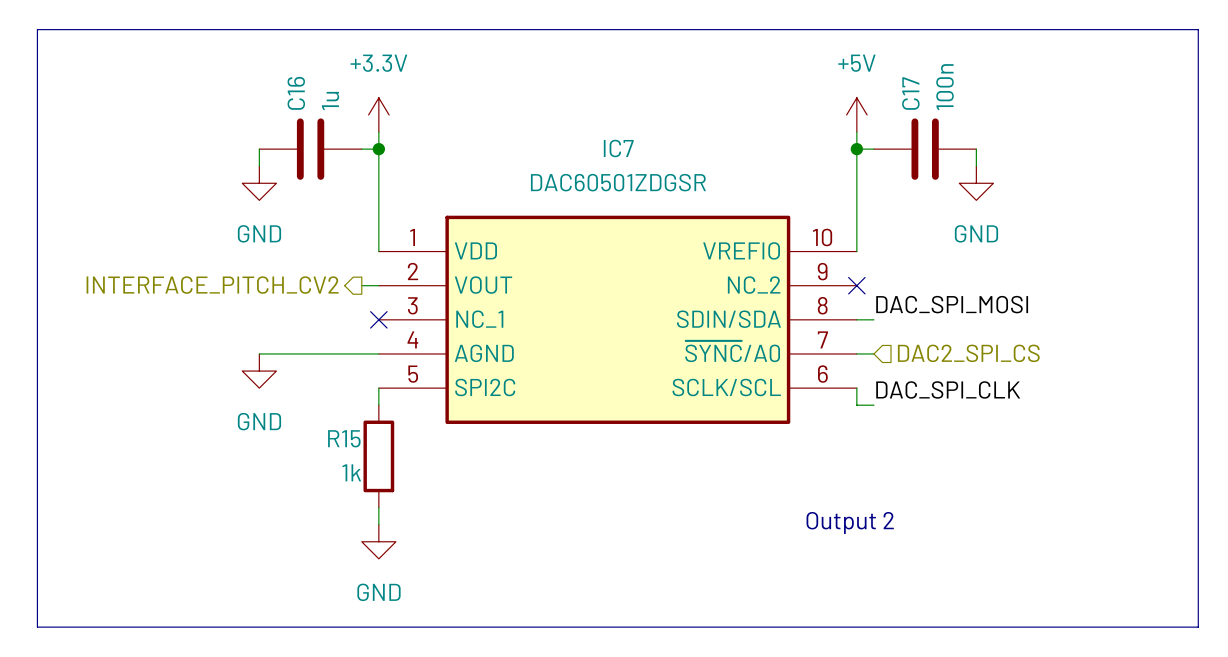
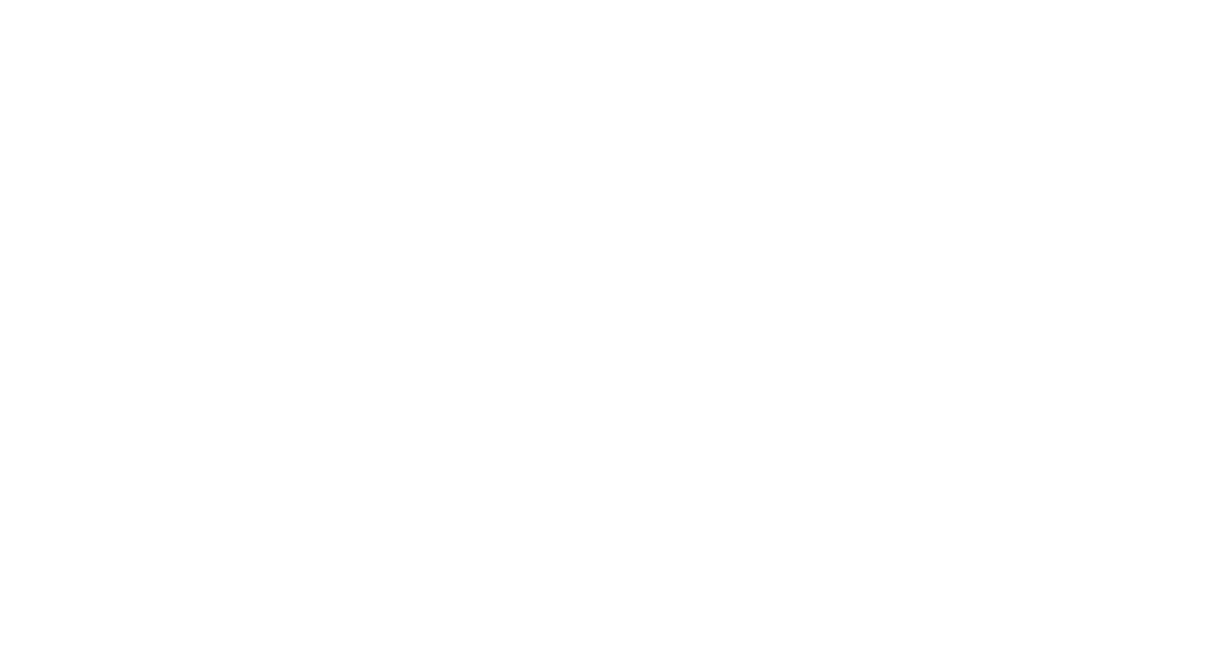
line: (37, 29) (1198, 29) (1198, 627) (37, 627) (37, 29) -> none
power symbol: +3.3V (378, 114) -> none
power symbol: +5V (856, 114) -> none
wire: (378, 132) (378, 251) -> none
wire: (856, 132) (856, 251) -> none
wire: (259, 149) (259, 166) -> none
C16: 1u (310, 149) -> none
wire: (361, 149) (378, 149) -> none
junction: (378, 149) -> none
wire: (856, 149) (873, 149) -> none
junction: (856, 149) -> none
C17: 100n (925, 149) -> none
wire: (976, 149) (976, 166) -> none
power symbol: GND (259, 183) -> none
power symbol: GND (976, 183) -> none
hierarchical label: INTERFACE_PITCH_CV2 (212, 285) -> none
wire: (361, 285) (378, 285) -> none
no-connect mark: (856, 285) -> none
label: DAC_SPI_MOSI (952, 304) -> none
no-connect mark: (378, 319) -> none
IC7: DAC60501ZDGSR (617, 319) -> none
wire: (856, 319) (873, 319) -> none
wire: (259, 353) (378, 353) -> none
wire: (856, 353) (873, 353) -> none
hierarchical label: DAC2_SPI_CS (968, 353) -> none
power symbol: GND (259, 371) -> none
wire: (378, 388) (378, 405) -> none
wire: (856, 388) (856, 405) (873, 405) -> none
label: DAC_SPI_CLK (948, 389) -> none
R15: 1k (378, 456) -> none
wire: (378, 507) (378, 524) -> none
text: Output 2 (850, 522) -> none
power symbol: GND (378, 541) -> none

